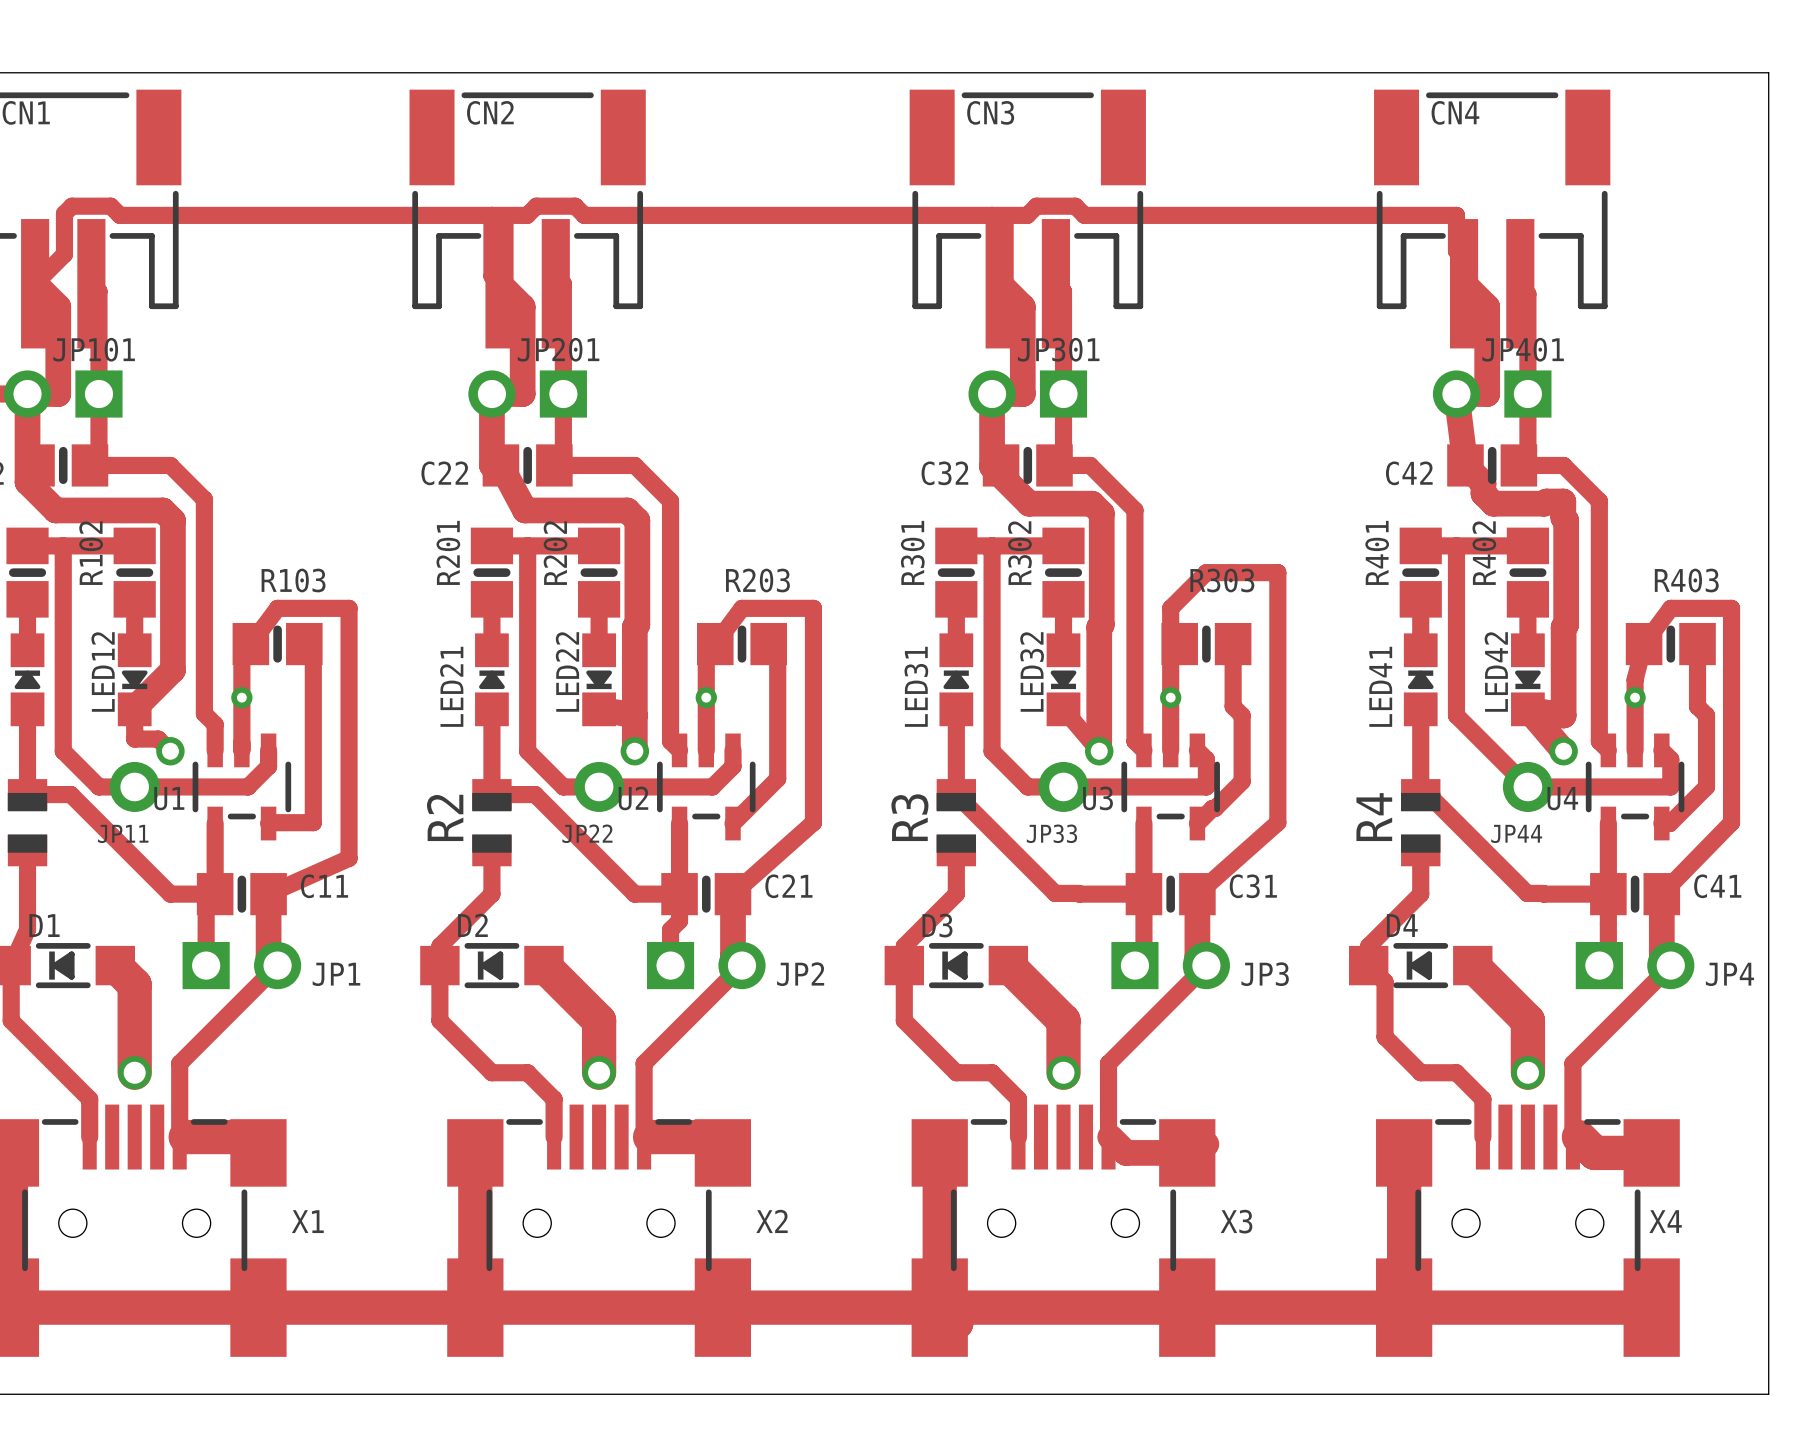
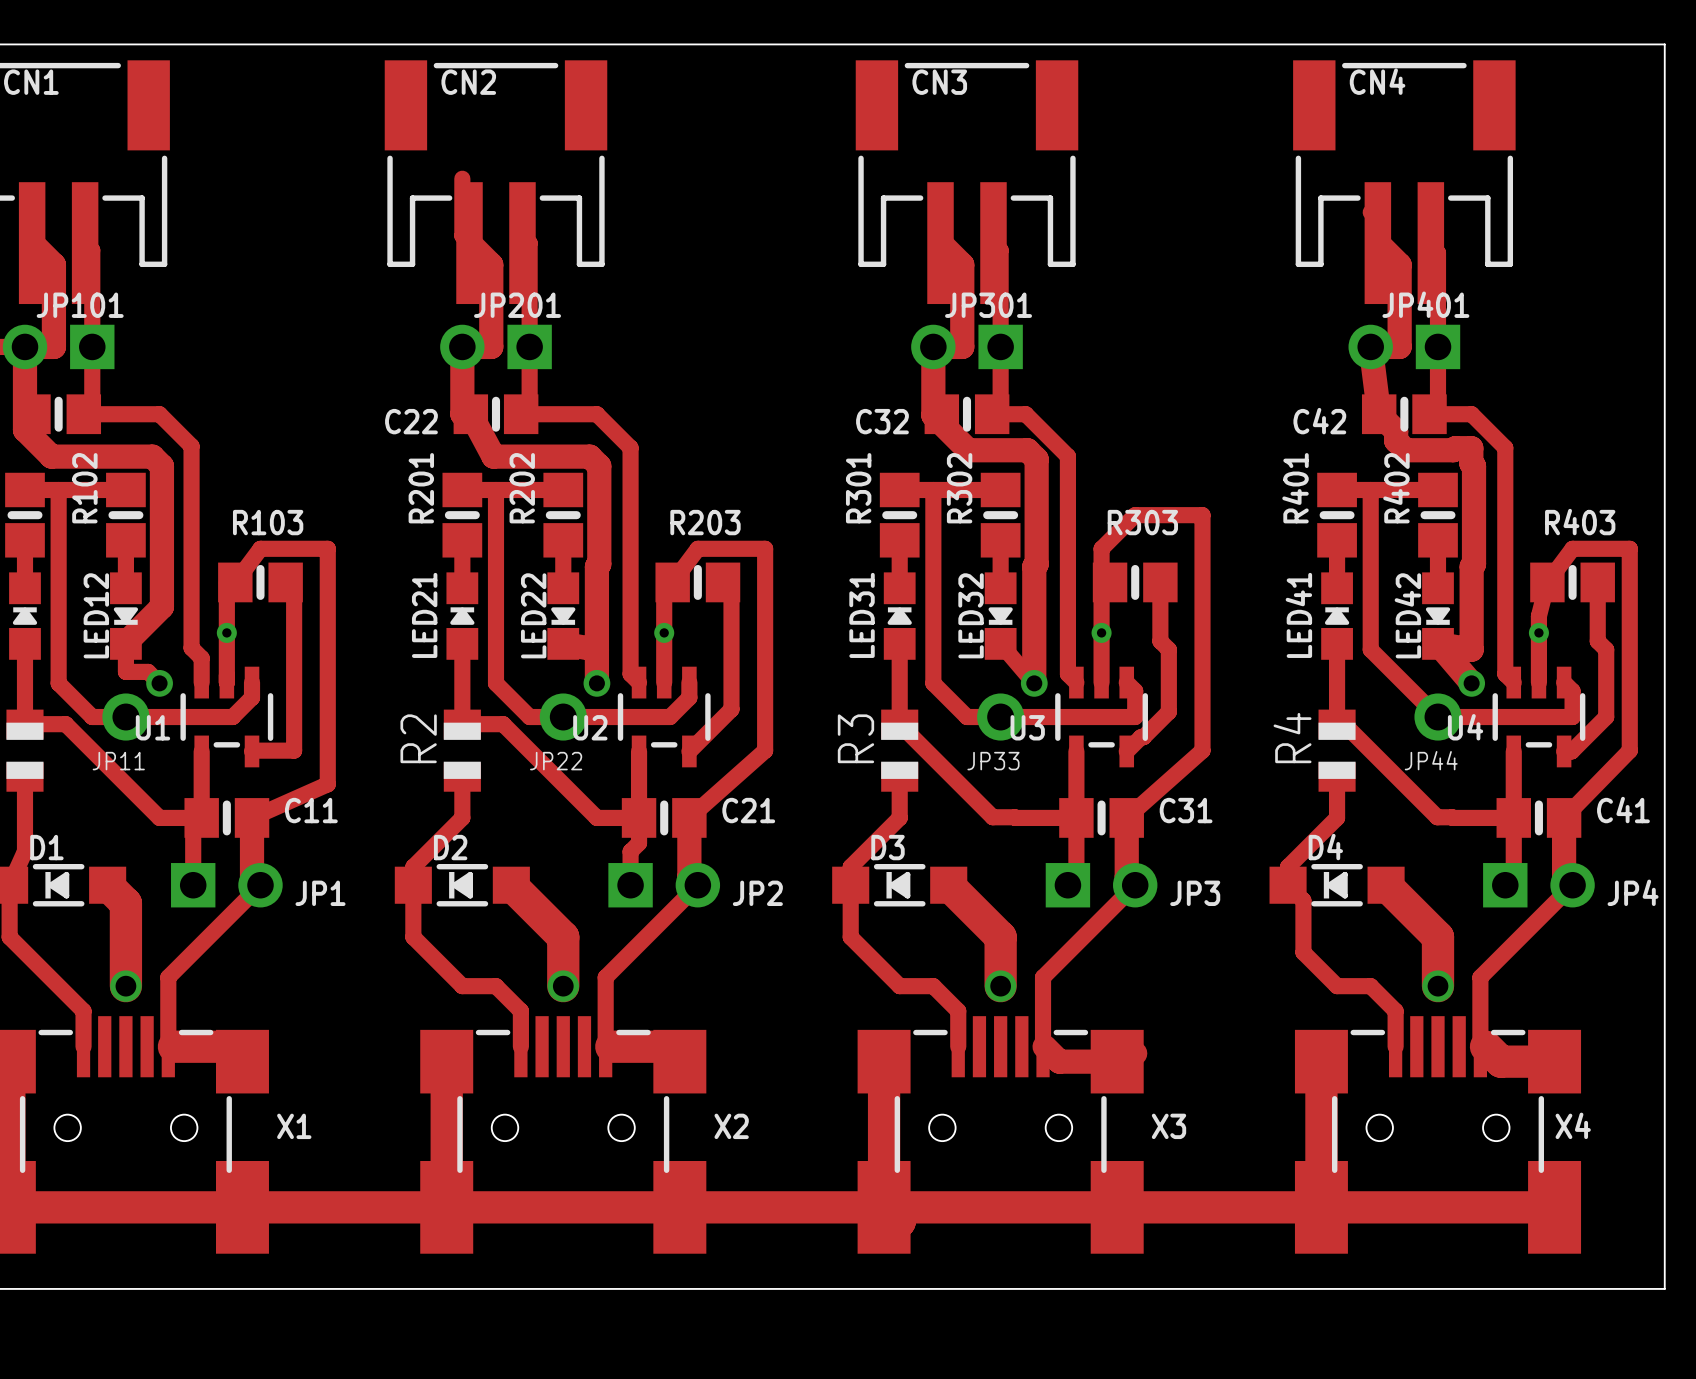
track: (1456, 251) (1456, 215) (1084, 215) (1075, 206) (1036, 206) (1027, 215) (584, 215) (575, 206) (536, 206) (527, 215) (119, 215) (110, 206) (71, 206) (64, 213) (64, 254) (35, 283) -> none

